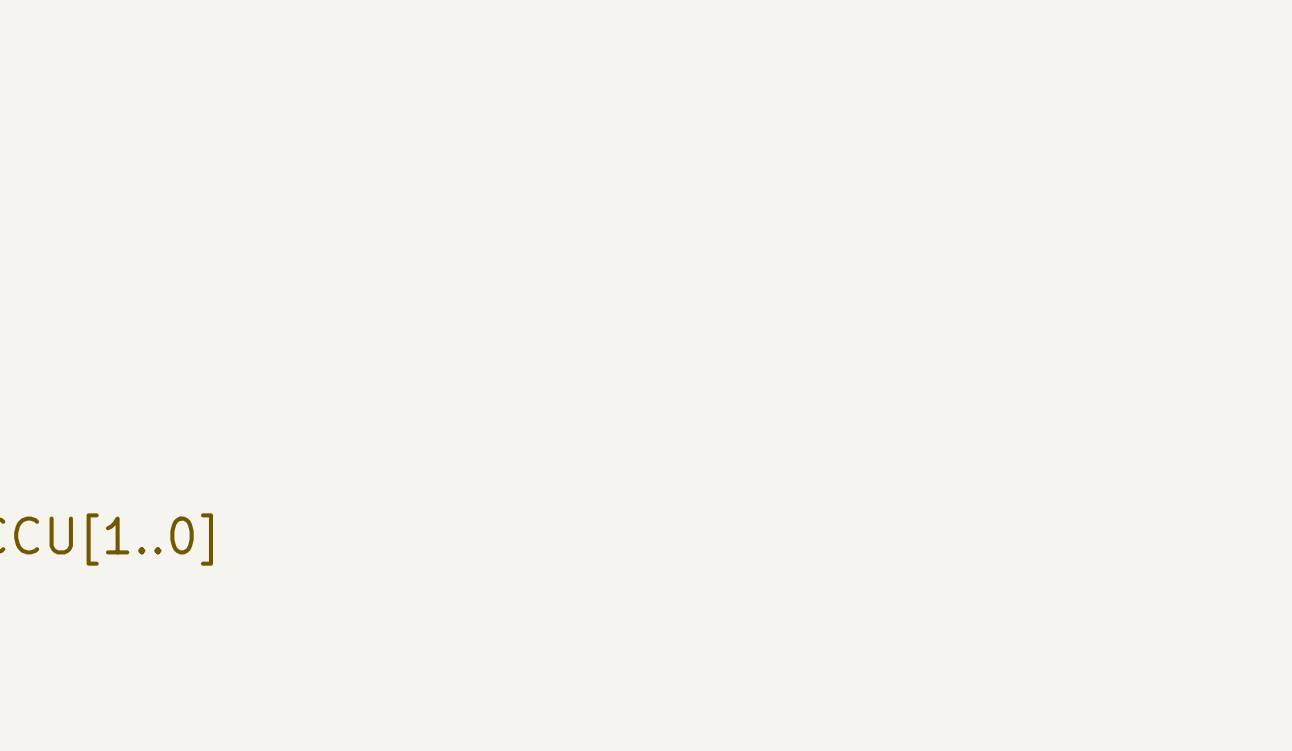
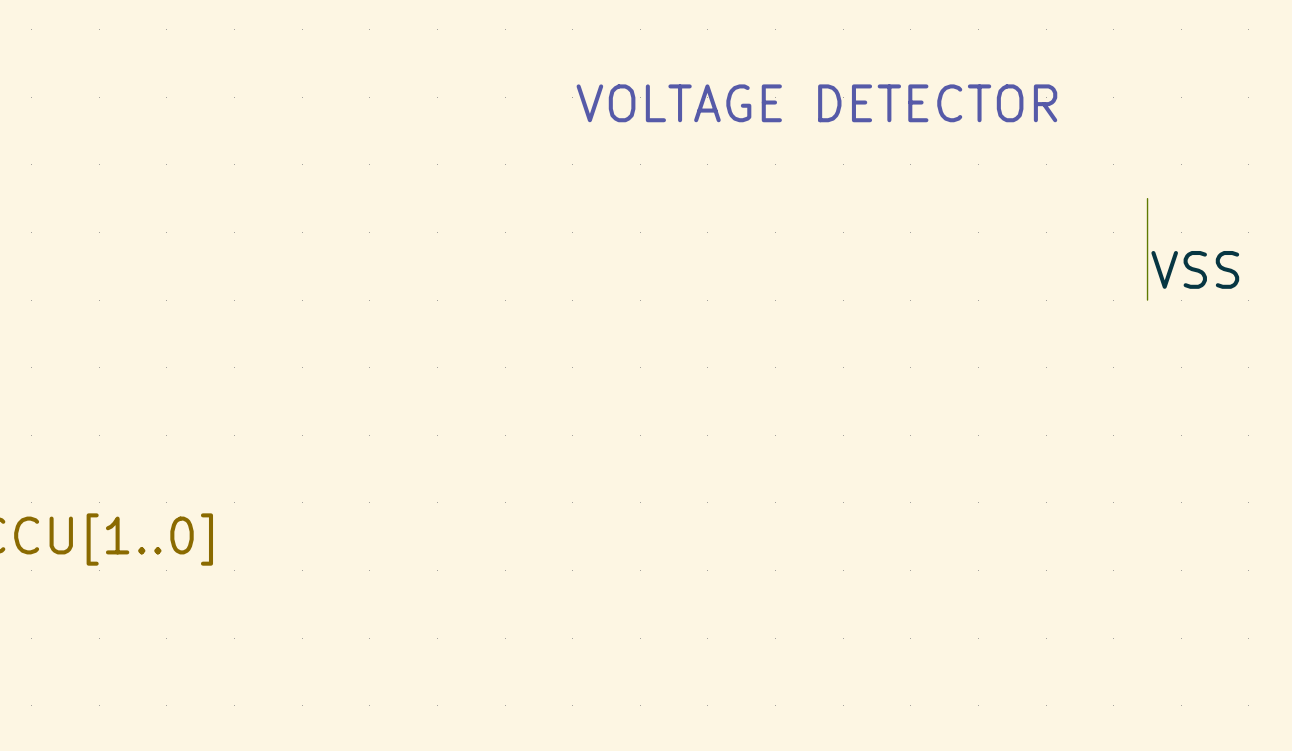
text: none -> VOLTAGE DETECTOR (816, 103)
wire: none -> (1147, 198) (1147, 300)
label: none -> VSS (1195, 269)

